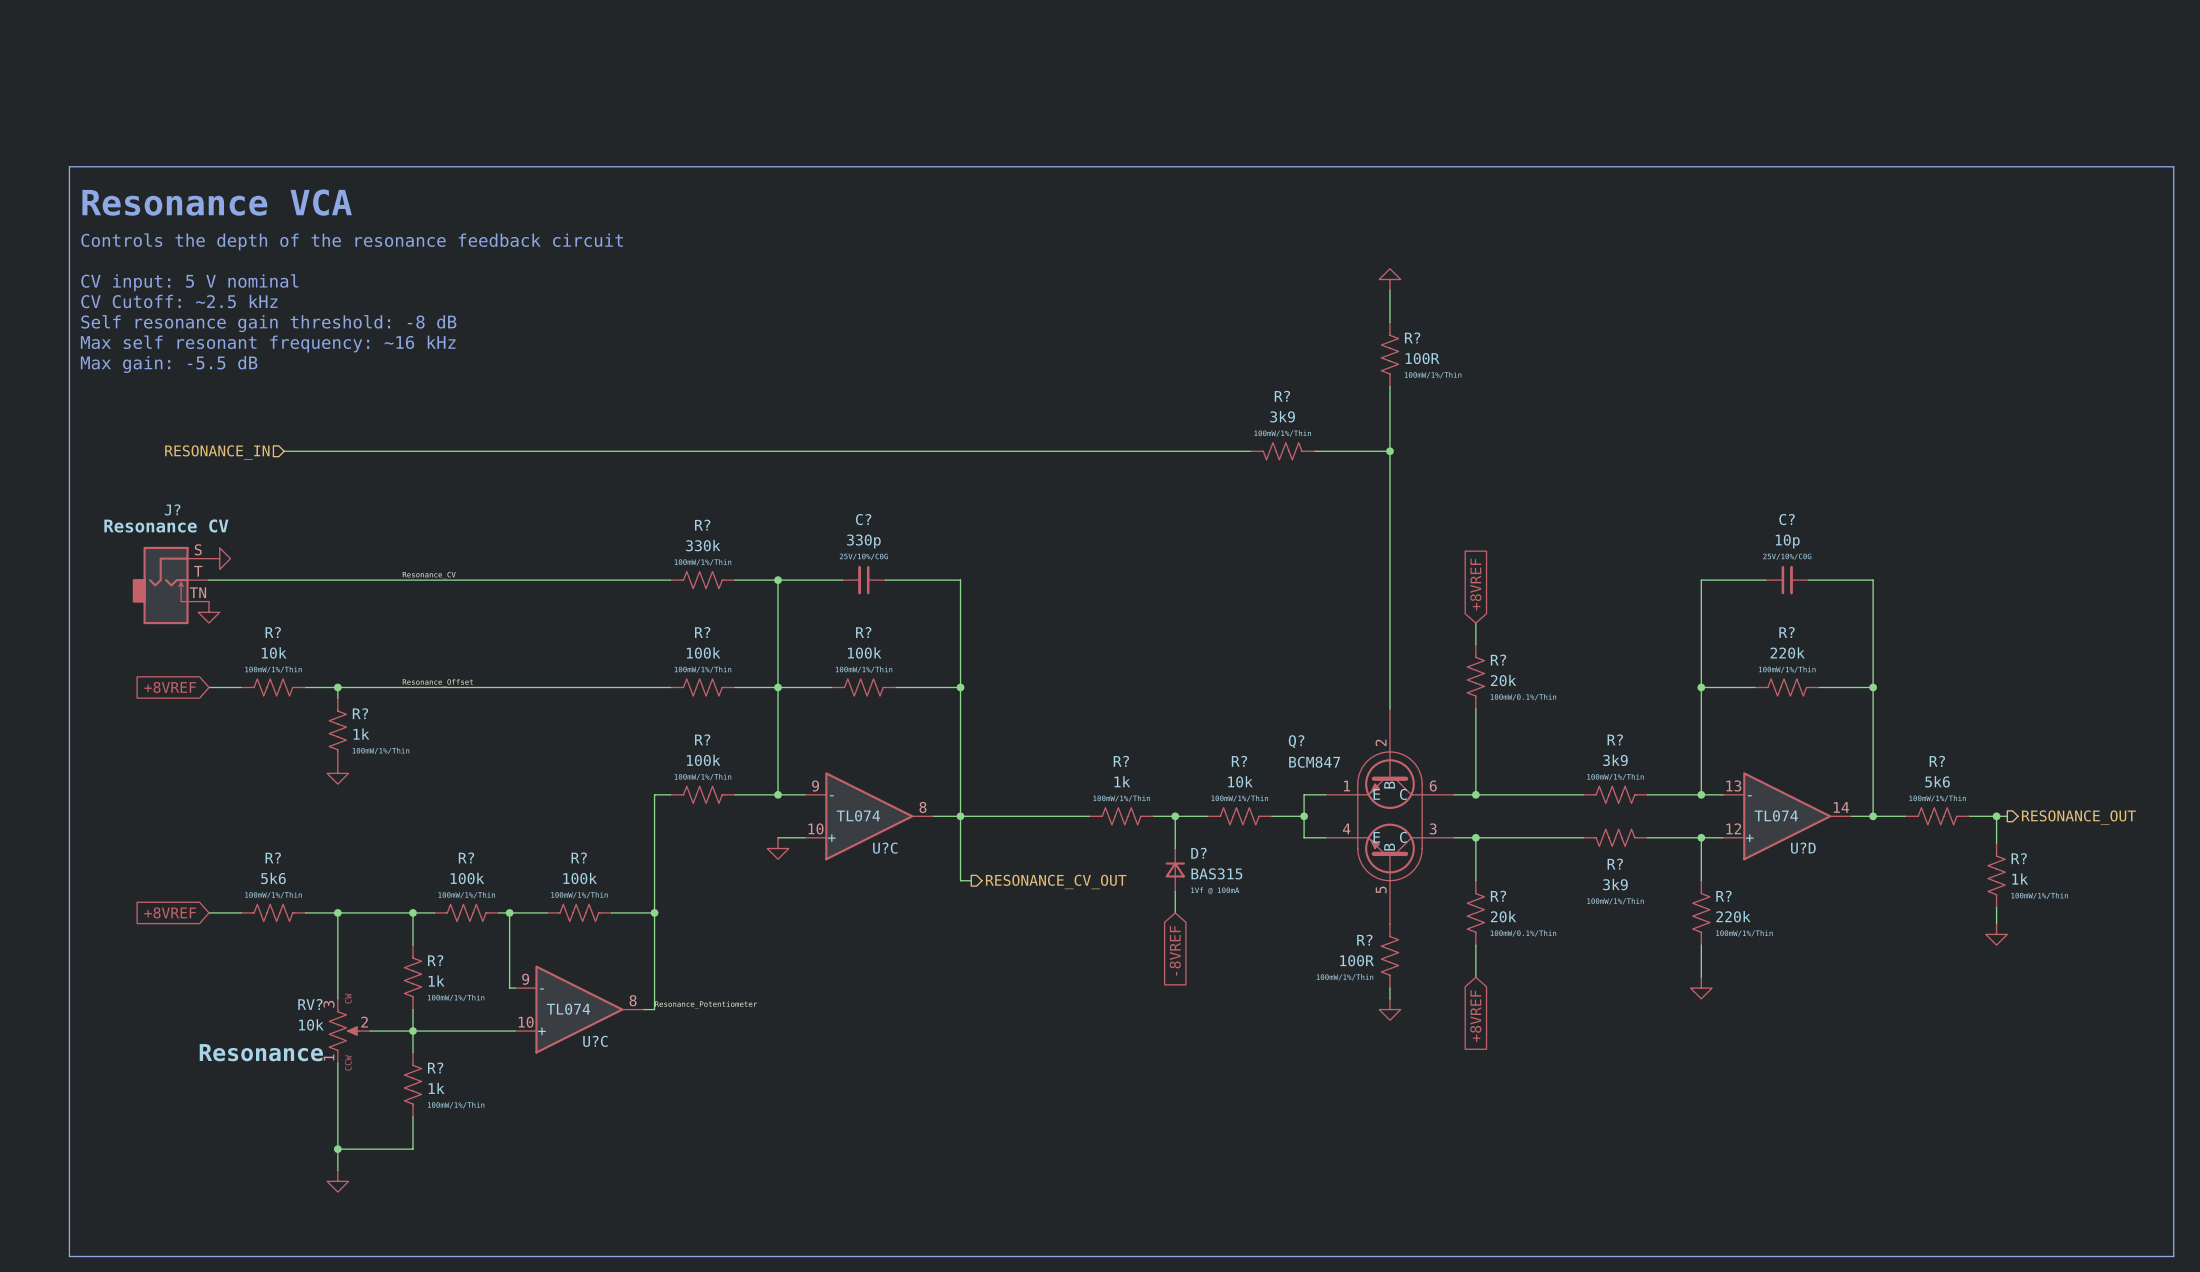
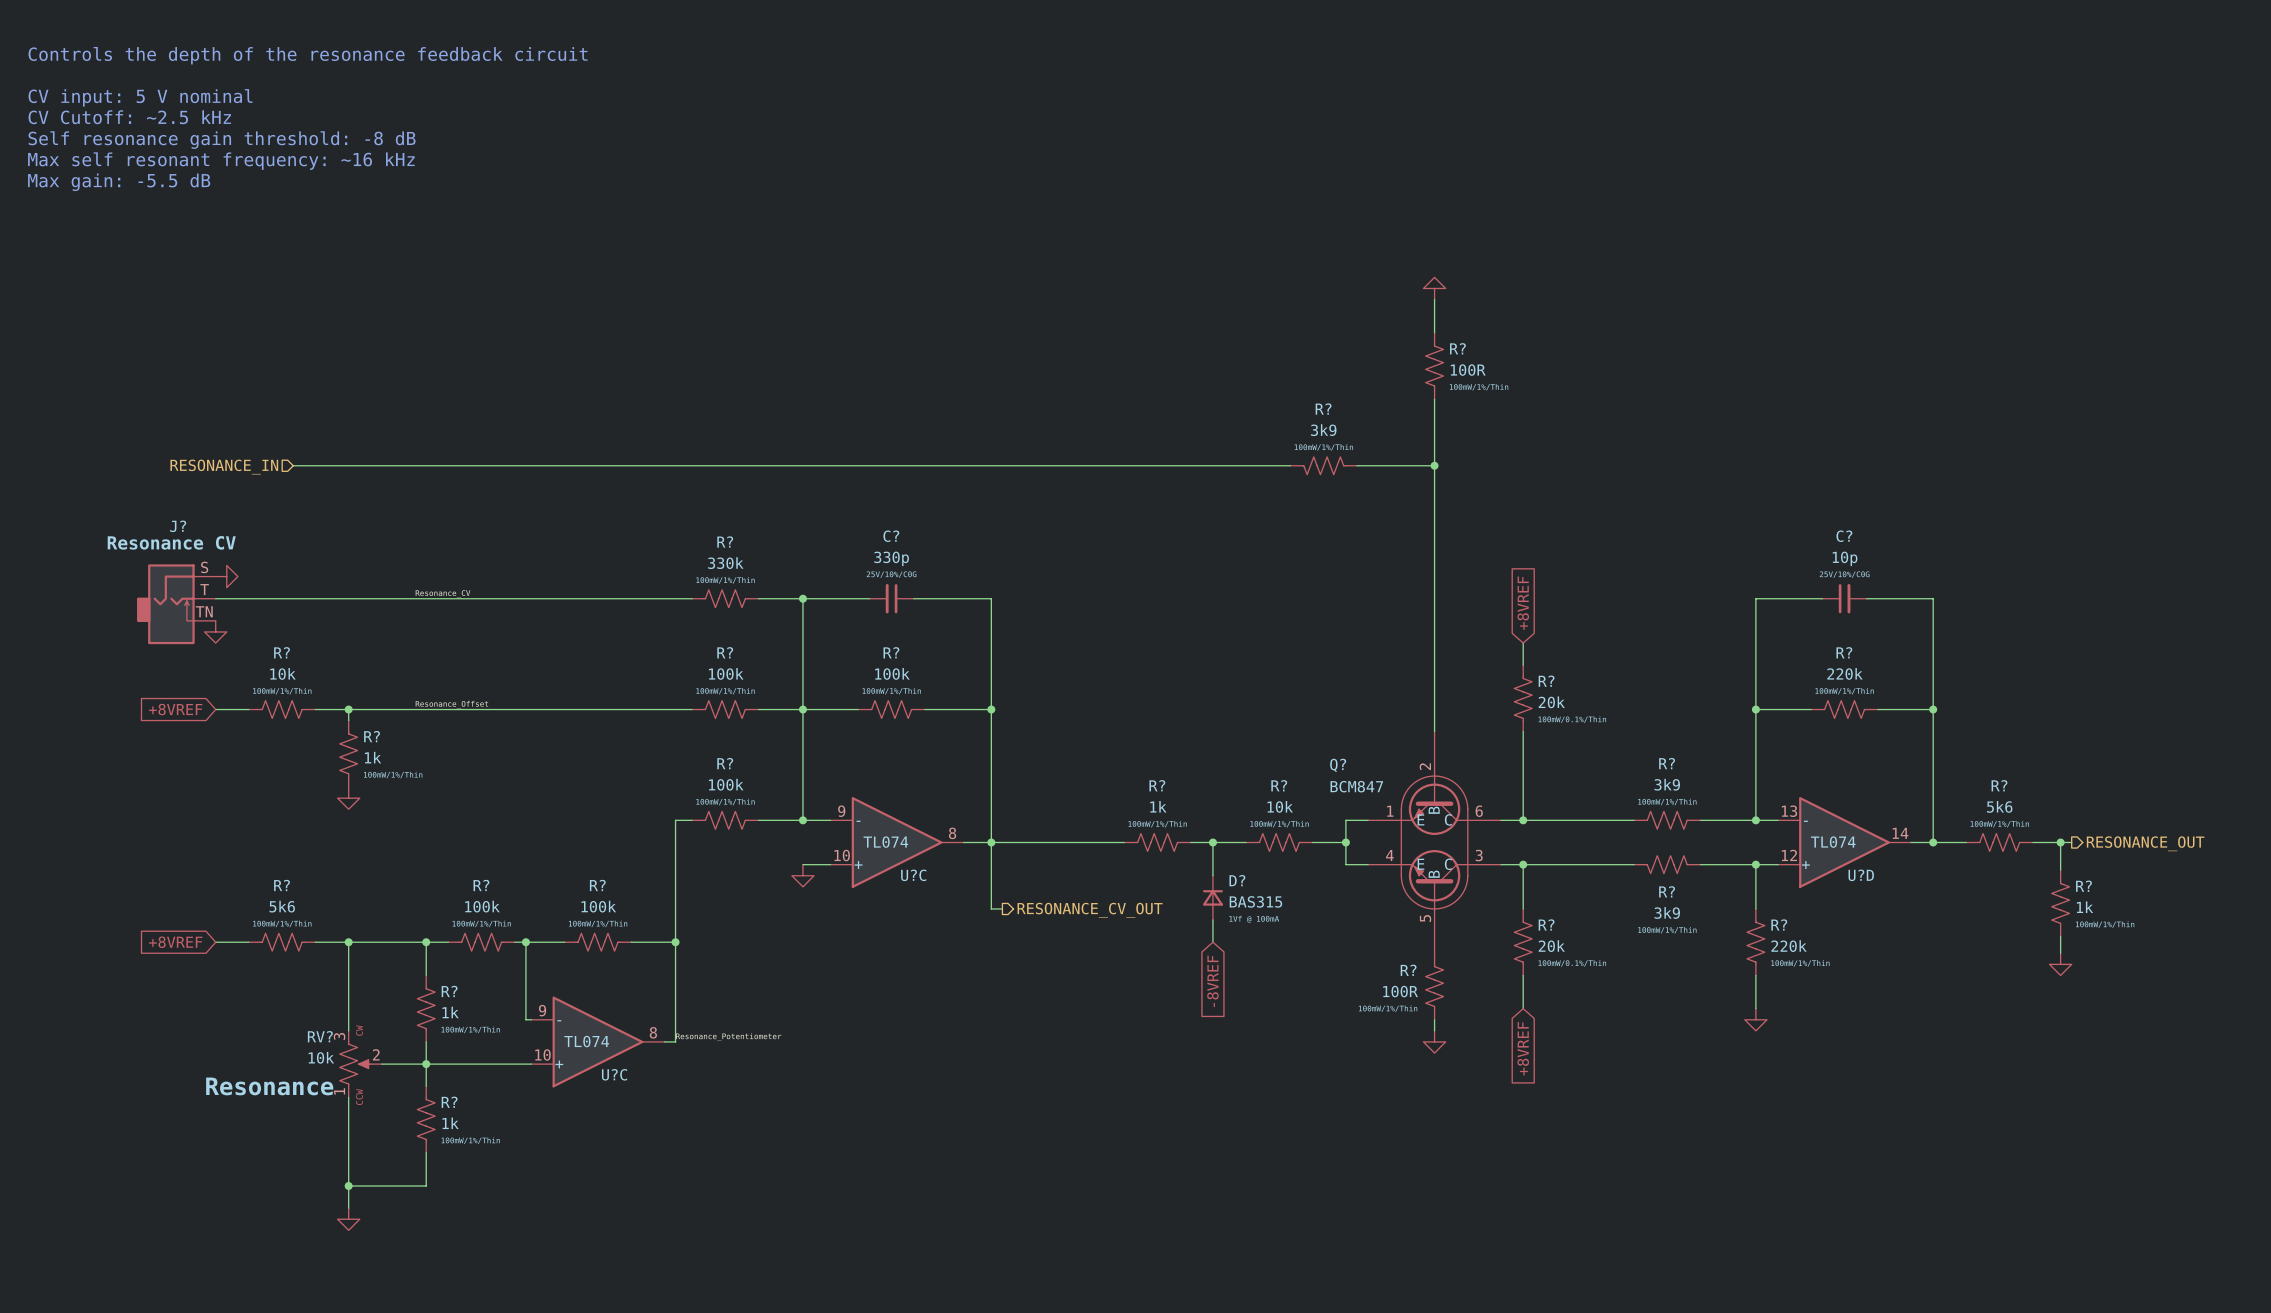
line: (69, 166) (2173, 166) (2173, 1256) (69, 1256) (69, 166) -> none
text: Resonance VCA (217, 202) -> none
text position: Controls the depth of the resonance feedback circuit (352, 241) -> Controls the depth of the resonance feedback circuit (308, 55)
text position: CV input: 5 V nominal (189, 282) -> CV input: 5 V nominal (140, 97)
text position: CV Cutoff: ~2.5 kHz (179, 301) -> CV Cutoff: ~2.5 kHz (129, 117)
text position: Self resonance gain threshold: -8 dB (268, 323) -> Self resonance gain threshold: -8 dB (222, 140)
text position: Max self resonant frequency: ~16 kHz (268, 343) -> Max self resonant frequency: ~16 kHz (221, 161)
text position: Max gain: -5.5 dB (169, 364) -> Max gain: -5.5 dB (119, 182)

